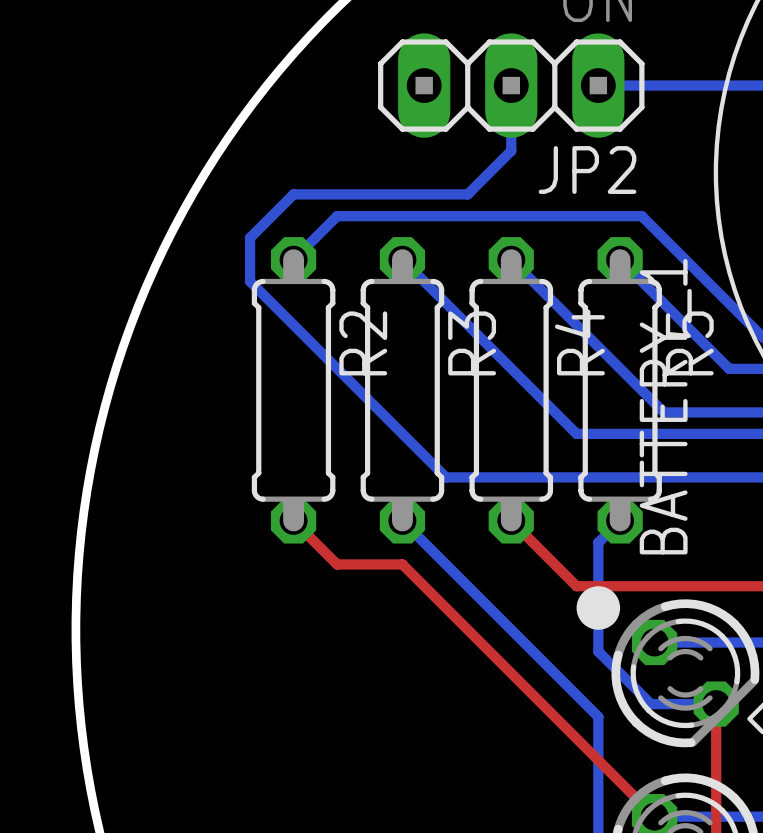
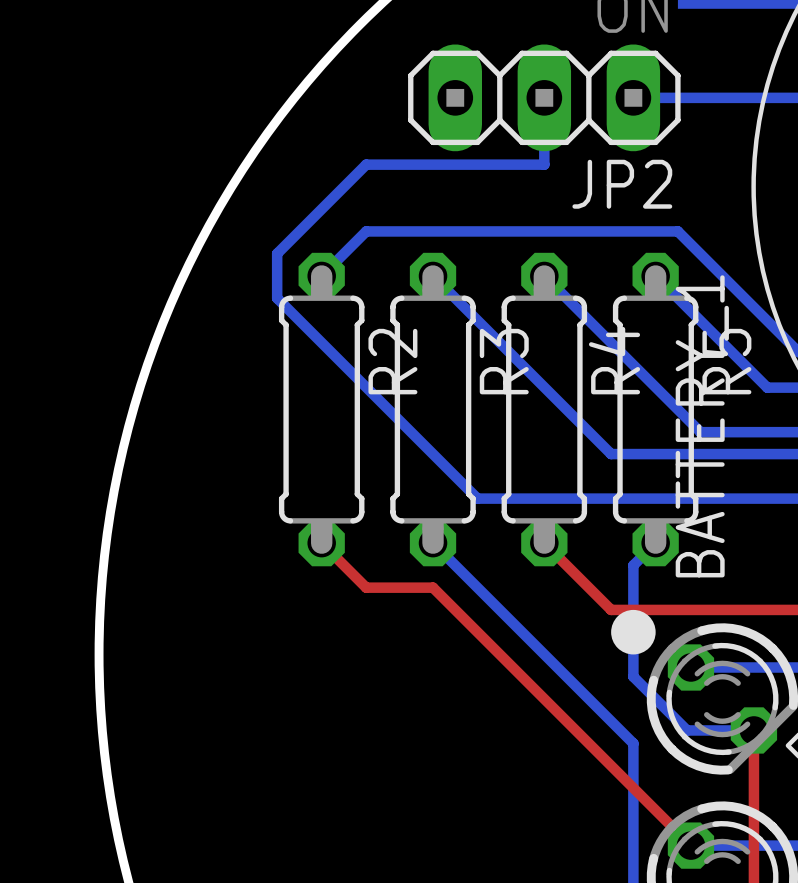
bottom track: (511, 150) (467, 194) (293, 194) -> (544, 164) (366, 164) (321, 209)

